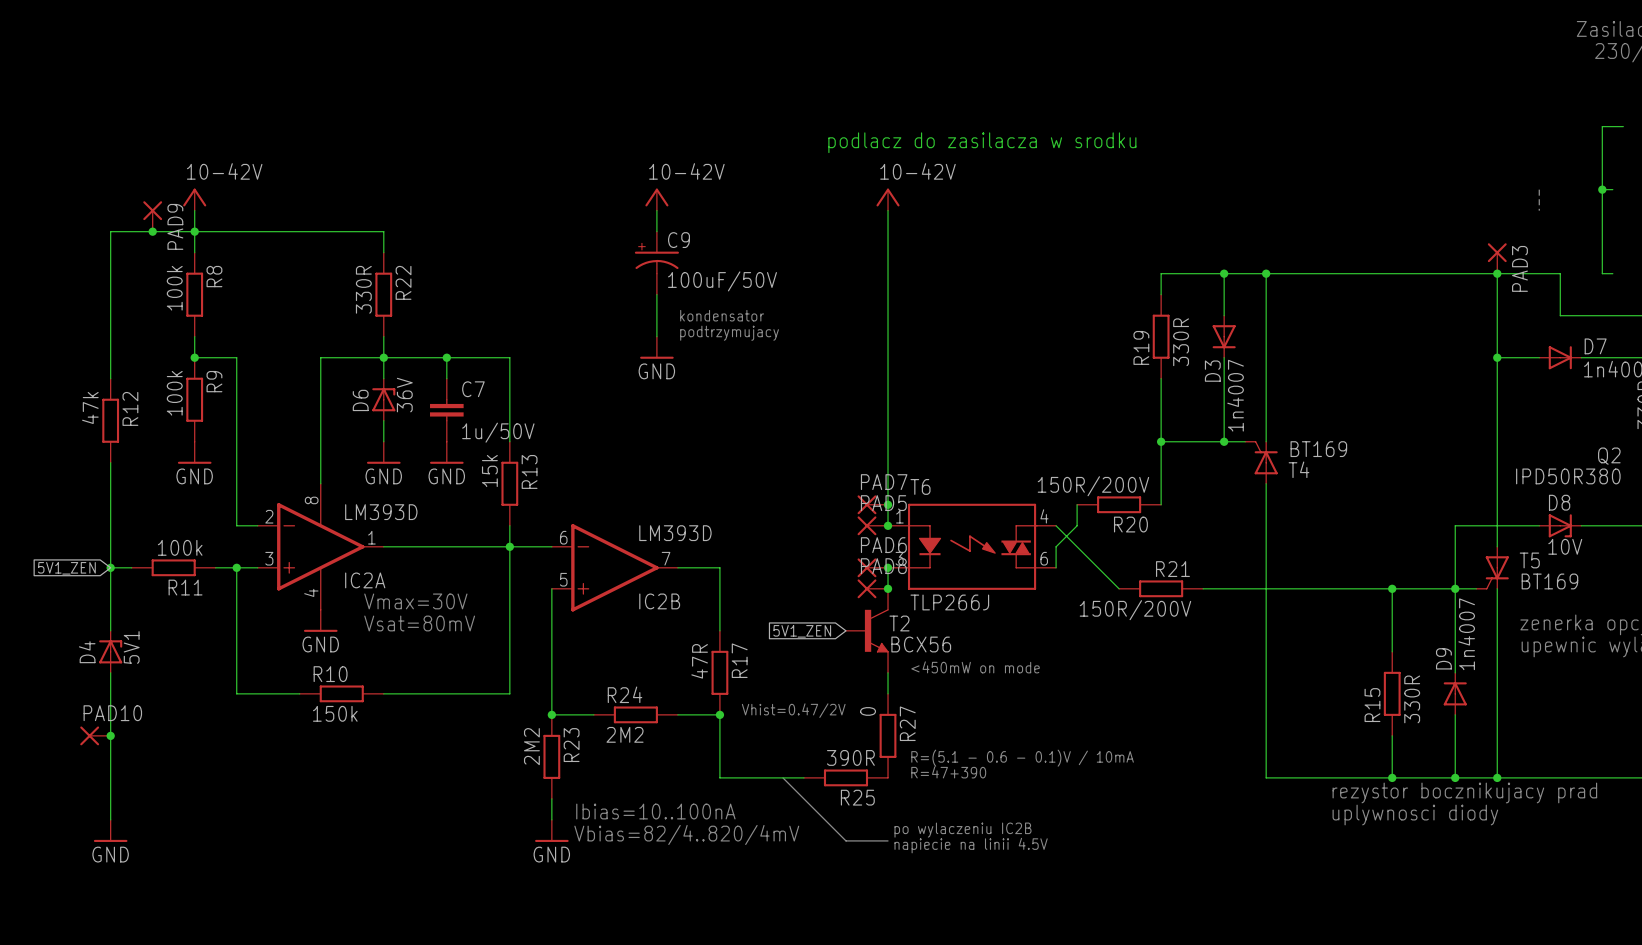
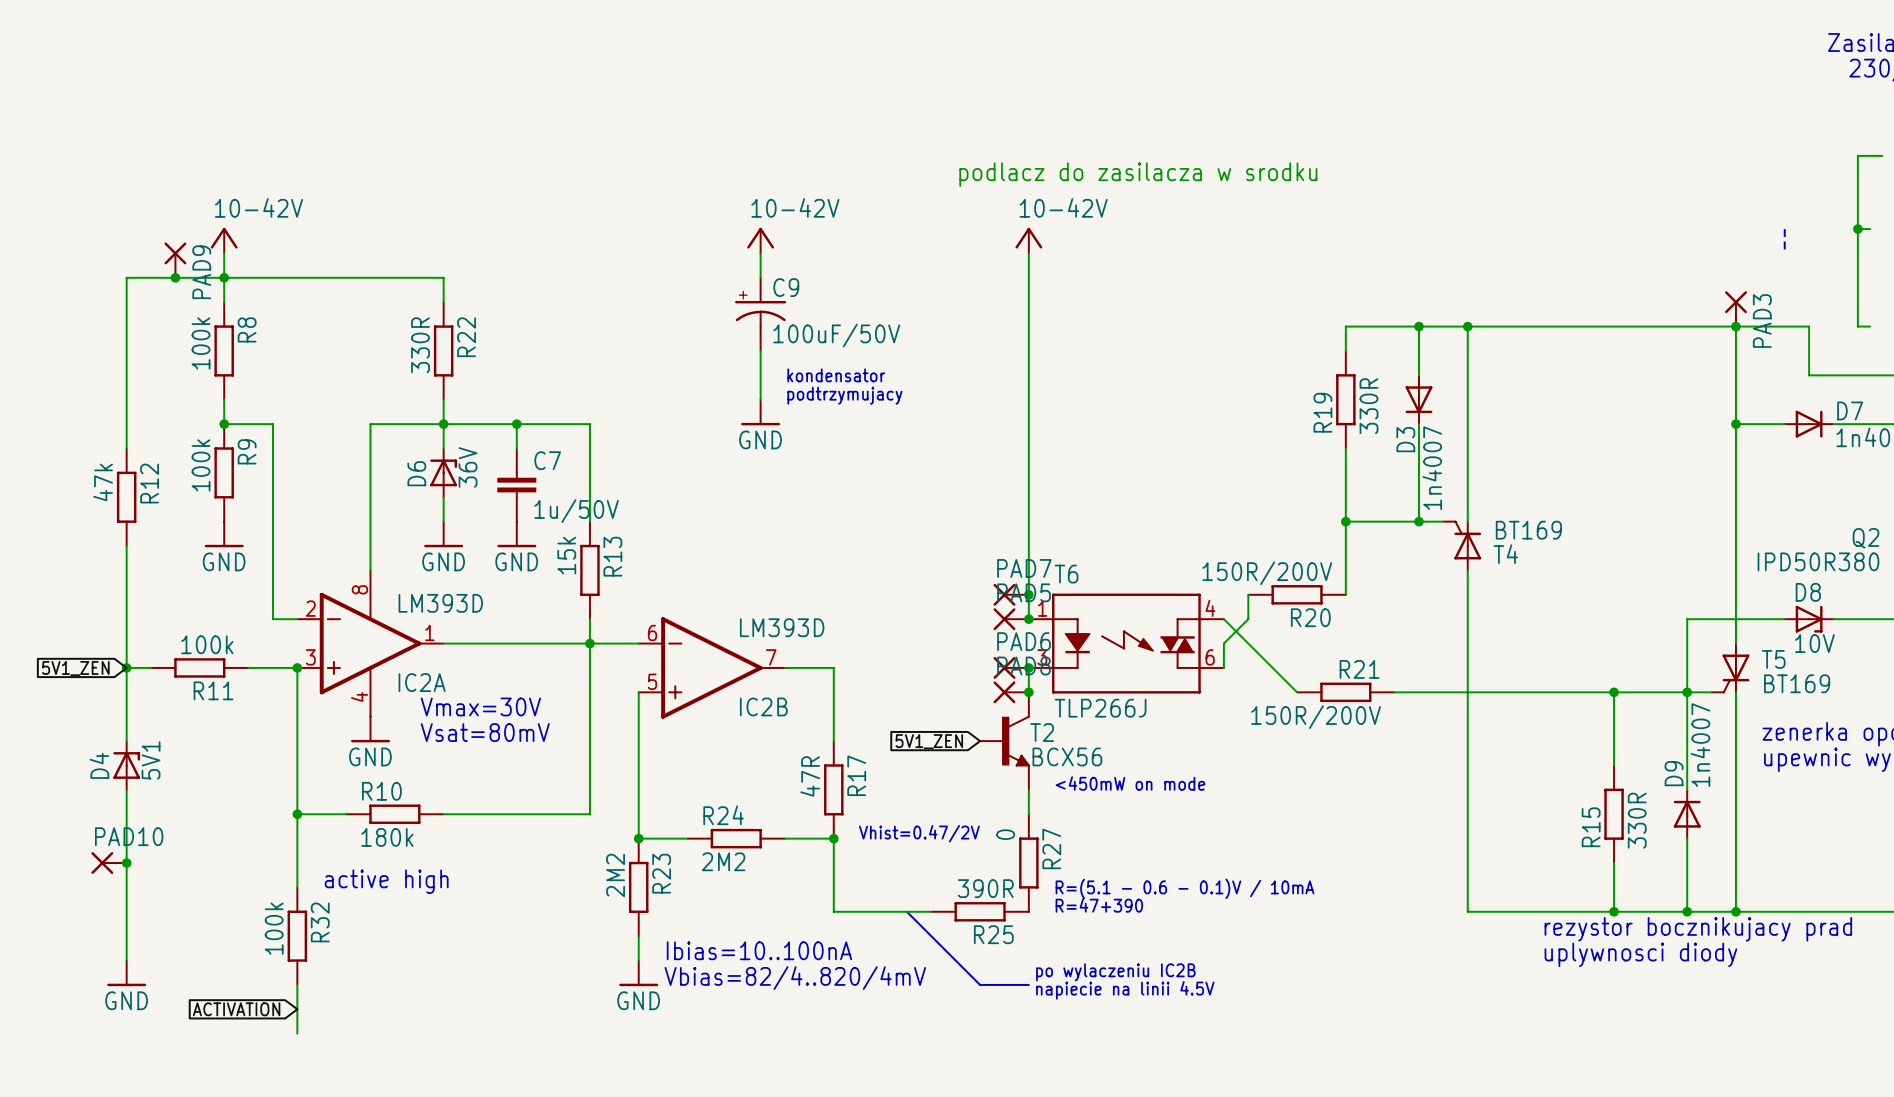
wire: (236, 567) (236, 693) (257, 693) -> none
junction position: (236, 567) -> (297, 667)
wire: none -> (297, 667) (297, 887)
junction: none -> (297, 814)
R10 value: 150k (335, 713) -> 180k (387, 837)
text: none -> active high (386, 881)
R32: none -> 100k (297, 936)
wire: none -> (297, 984) (297, 1033)
global label: none -> ACTIVATION (236, 1009)

